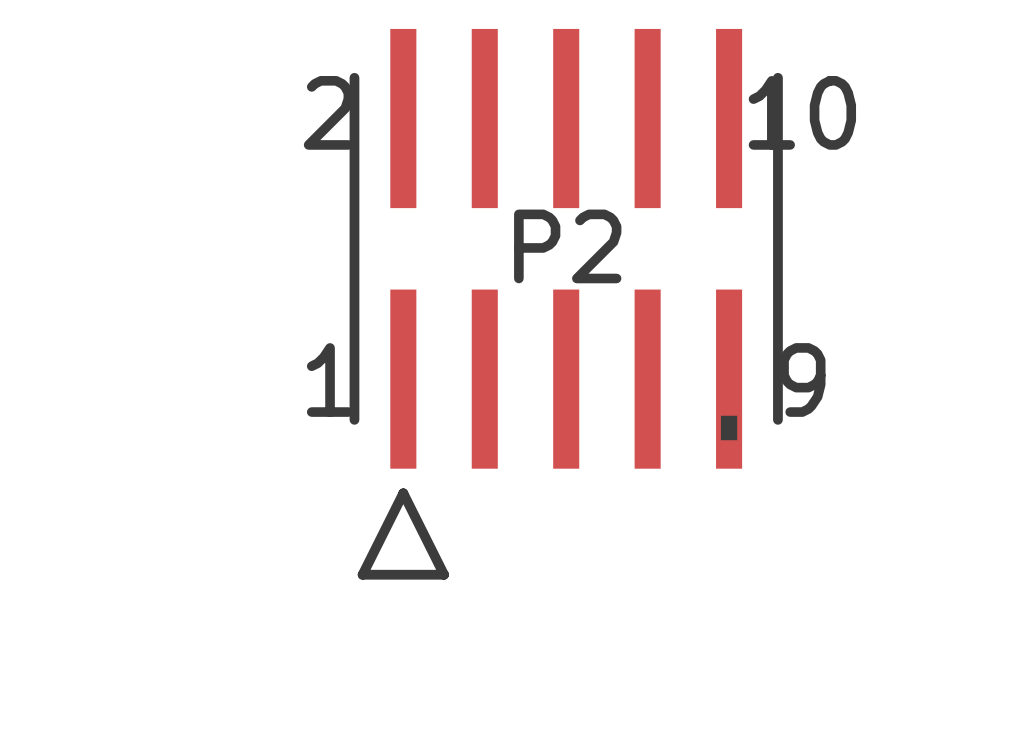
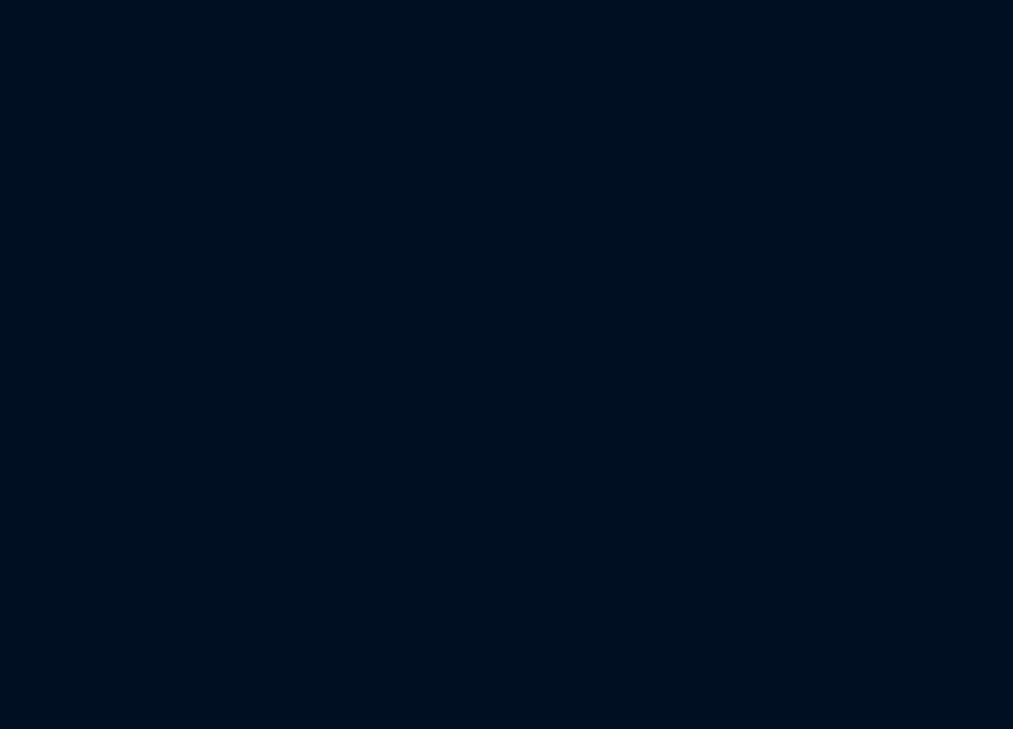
P2: (566, 304) -> none

